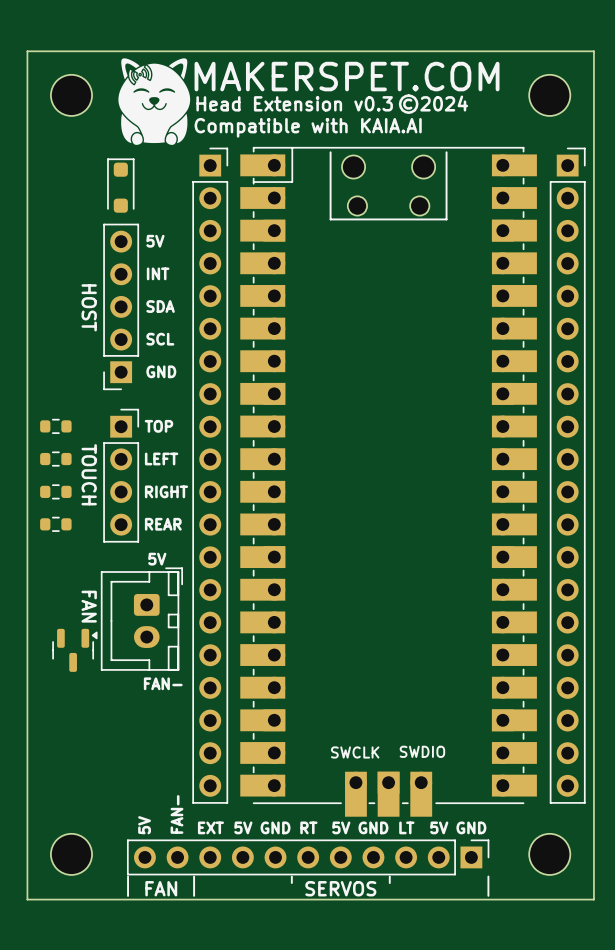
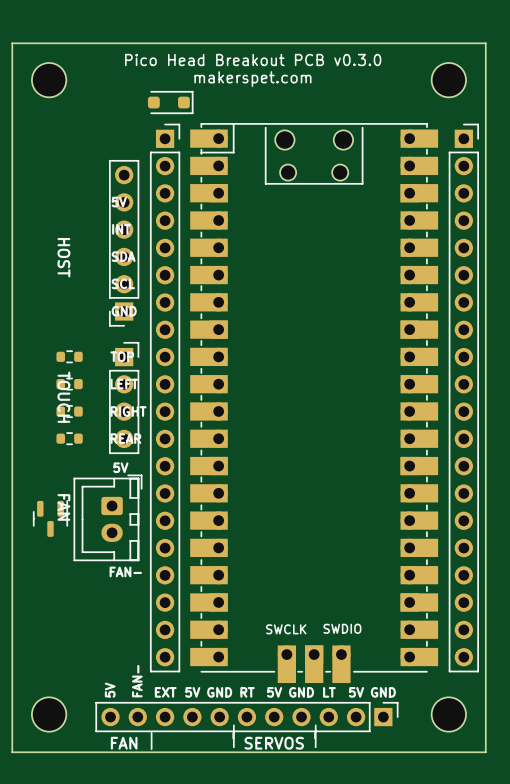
drawing: [118, 58, 191, 145] -> none
text: none -> Pico Head Breakout PCB v0.3.0 (253, 59)
text: MAKERSPET.COM (347, 76) -> none
text: none -> makerspet.com (252, 79)
text: Head Extension v0.3 (294, 103) -> none
text: ©2024 (433, 104) -> none
text: Compatible with KAIA.AI (308, 127) -> none
part rotation: 0° (120, 185) -> 90° clockwise (170, 102)
part position: (120, 185) -> (170, 102)
part: none -> (124, 243)
part: (121, 306) -> none
part: (55, 426) -> none
part: none -> (69, 356)
part: (55, 459) -> none
part: none -> (69, 384)
part position: (121, 475) -> (124, 398)
part: (55, 491) -> none
part: none -> (69, 411)
part: (55, 524) -> none
part: none -> (69, 438)
part: none -> (50, 518)
part: (74, 650) -> none
line: none -> (233, 725) (233, 747)
line: none -> (315, 725) (315, 747)
line: (128, 876) (128, 895) -> none
line: (488, 876) (488, 895) -> none

